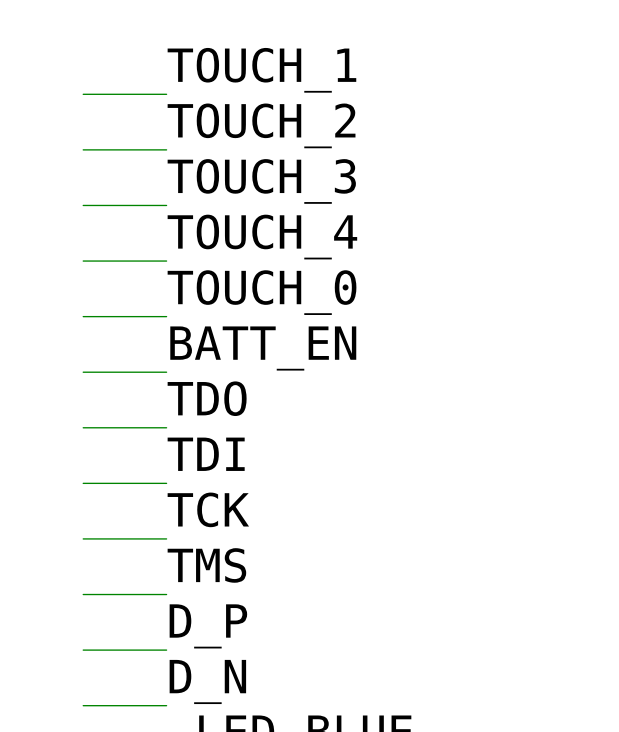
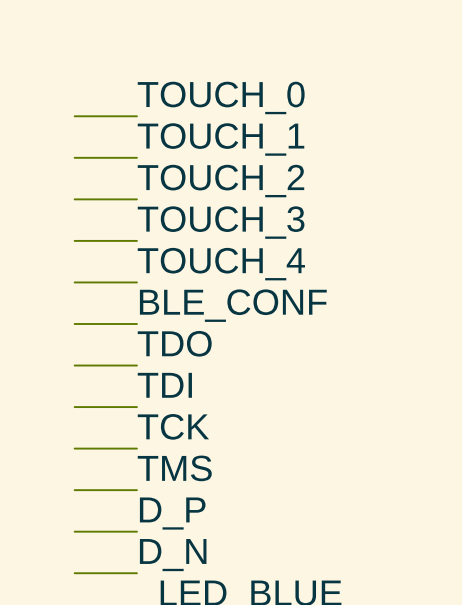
label: TOUCH_1 (261, 70) -> TOUCH_0 (221, 97)
label: TOUCH_2 (261, 125) -> TOUCH_1 (221, 139)
label: TOUCH_3 (261, 181) -> TOUCH_2 (220, 181)
label: TOUCH_4 (262, 237) -> TOUCH_3 (221, 222)
label: TOUCH_0 (262, 292) -> TOUCH_4 (221, 264)
label: BATT_EN (263, 348) -> BLE_CONF (233, 305)

